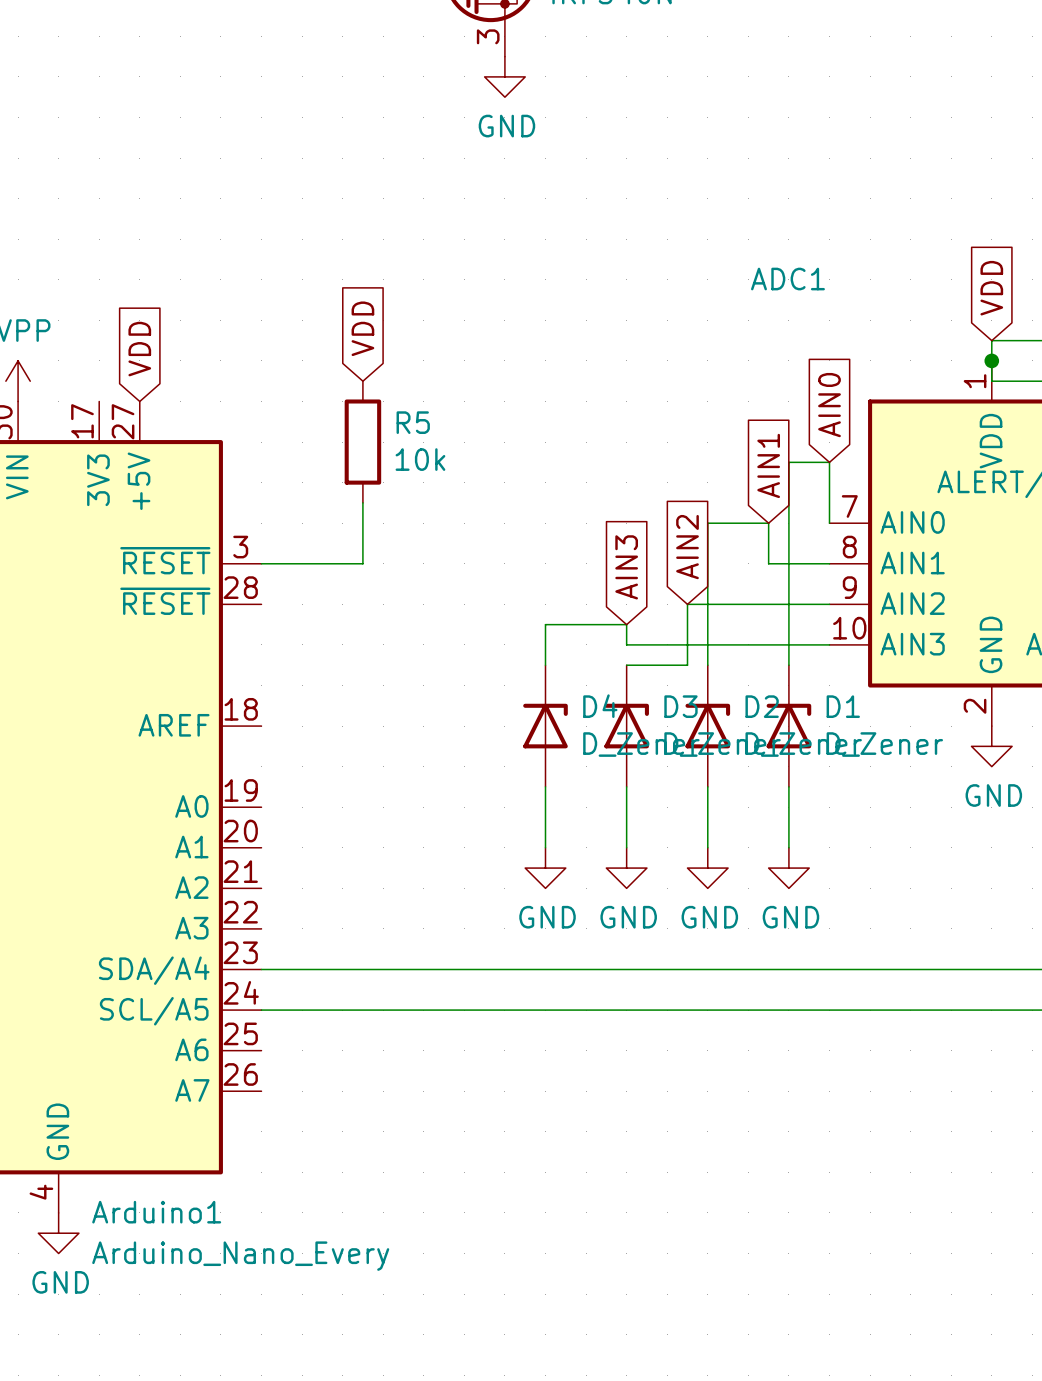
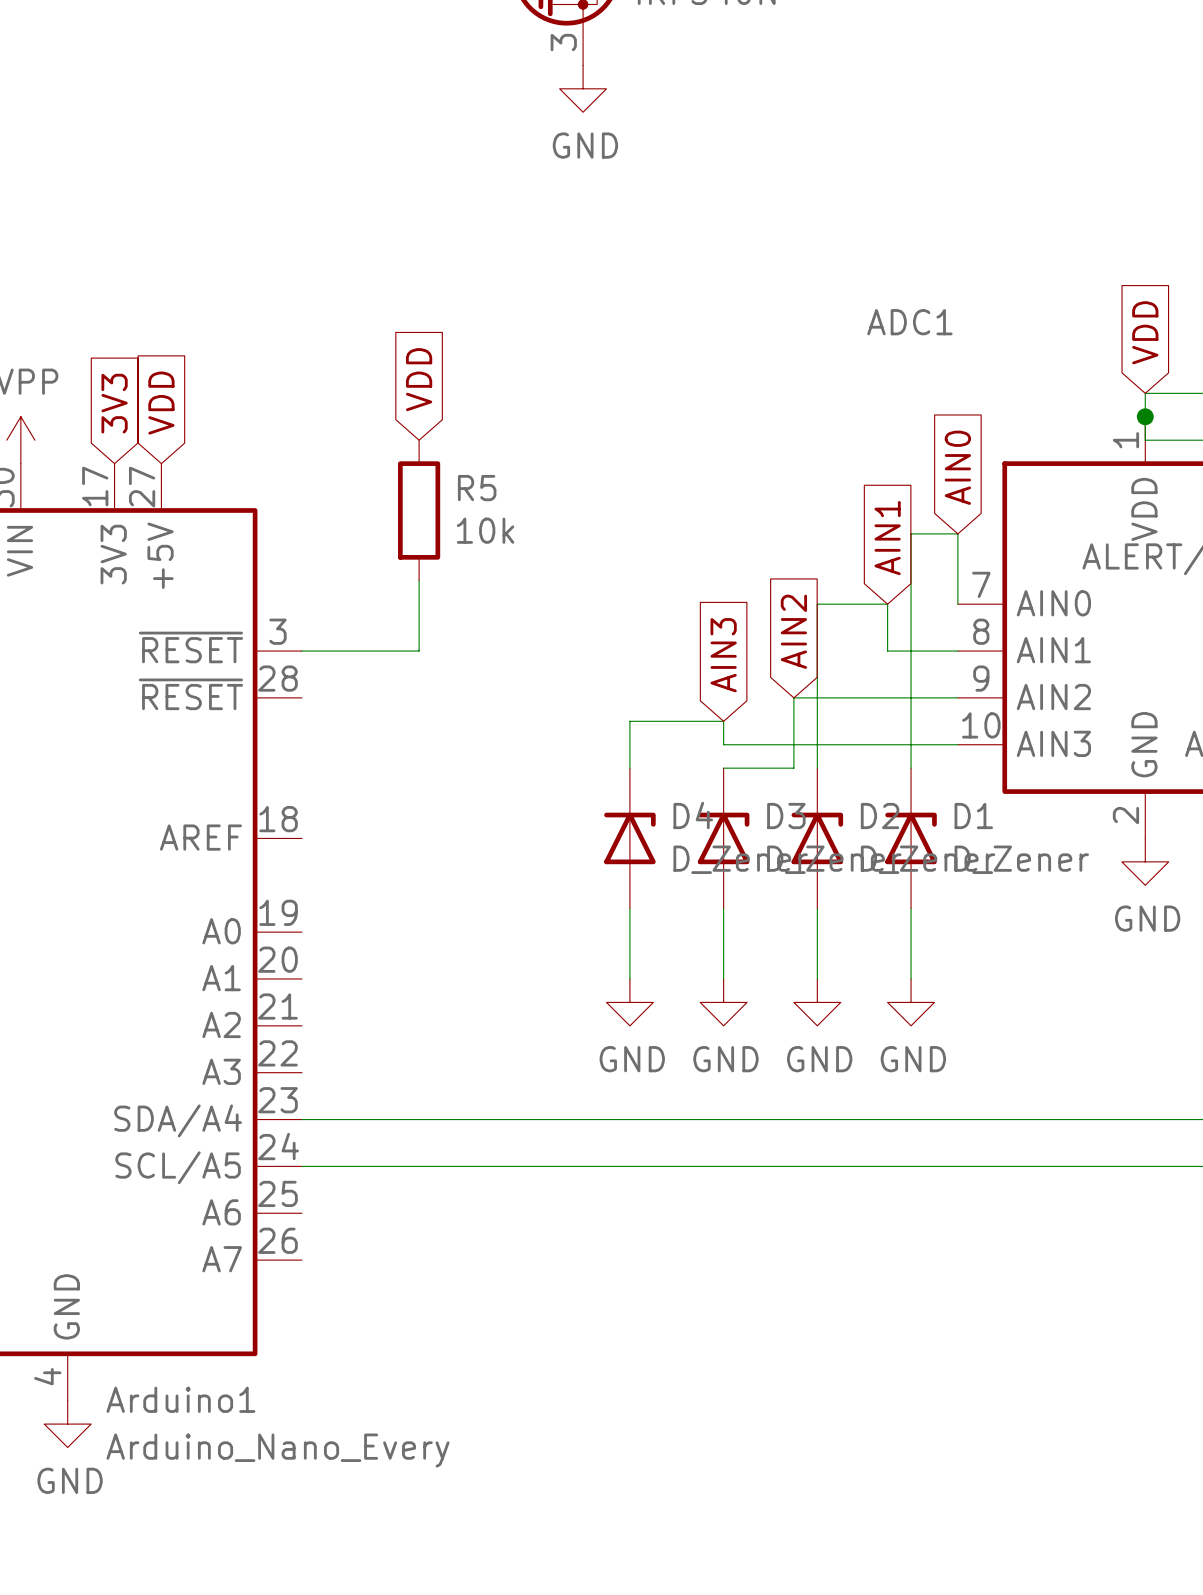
global label: none -> 3V3 (114, 403)

